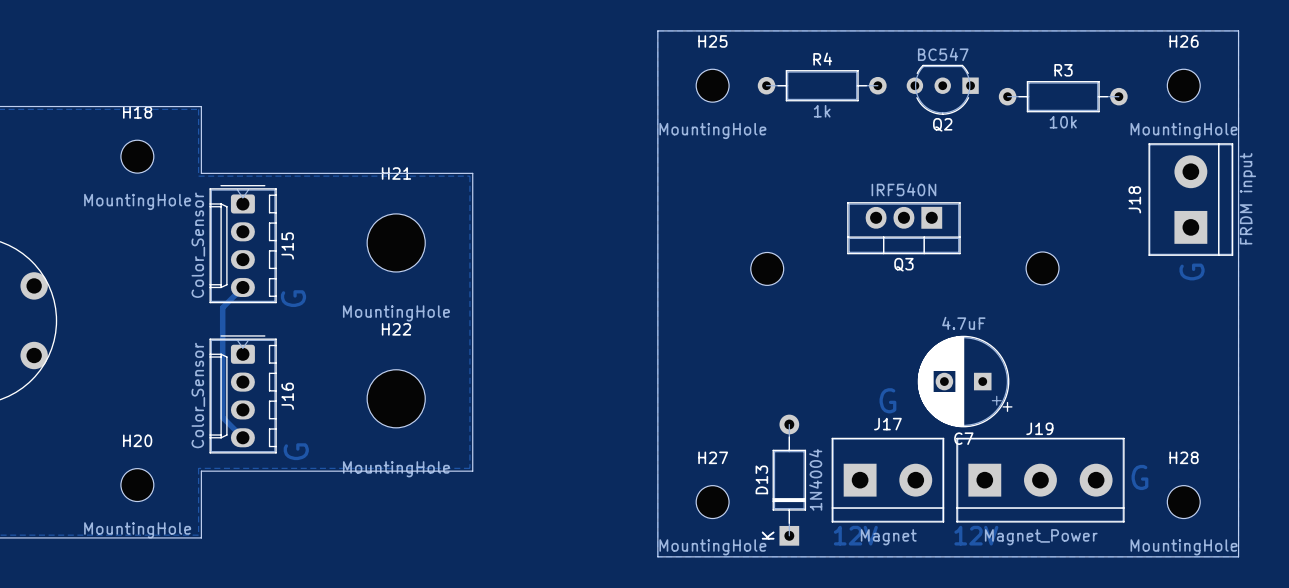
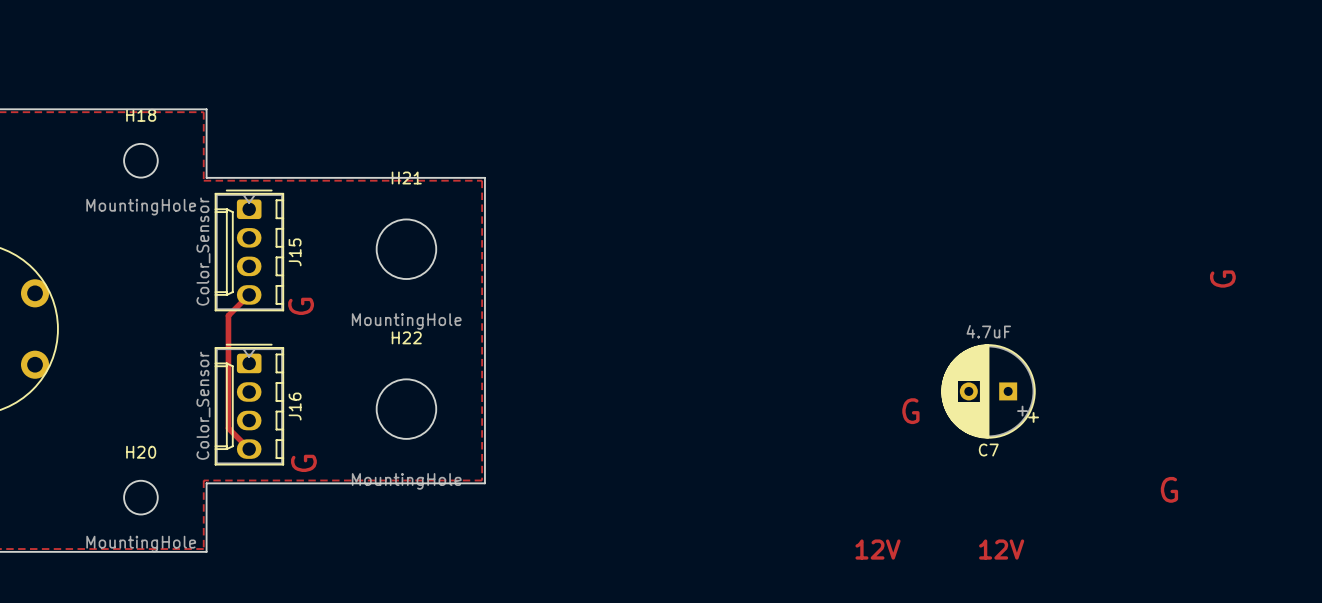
board edge: (657, 30) (1238, 30) (1238, 556) (657, 556) (657, 30) -> none
H25: MountingHole (712, 85) -> none
R4: 1k (822, 85) -> none
H26: MountingHole (1183, 85) -> none
Q2: BC547 (942, 89) -> none
R3: 10k (1063, 96) -> none
J18: FRDM input (1190, 199) -> none
Q3: IRF540N (903, 228) -> none
part: (767, 268) -> none
part: (1042, 268) -> none
D13: 1N4004 (789, 480) -> none
J17: Magnet (887, 480) -> none
J19: Magnet_Power (1040, 480) -> none
H27: MountingHole (712, 502) -> none
H28: MountingHole (1183, 502) -> none

